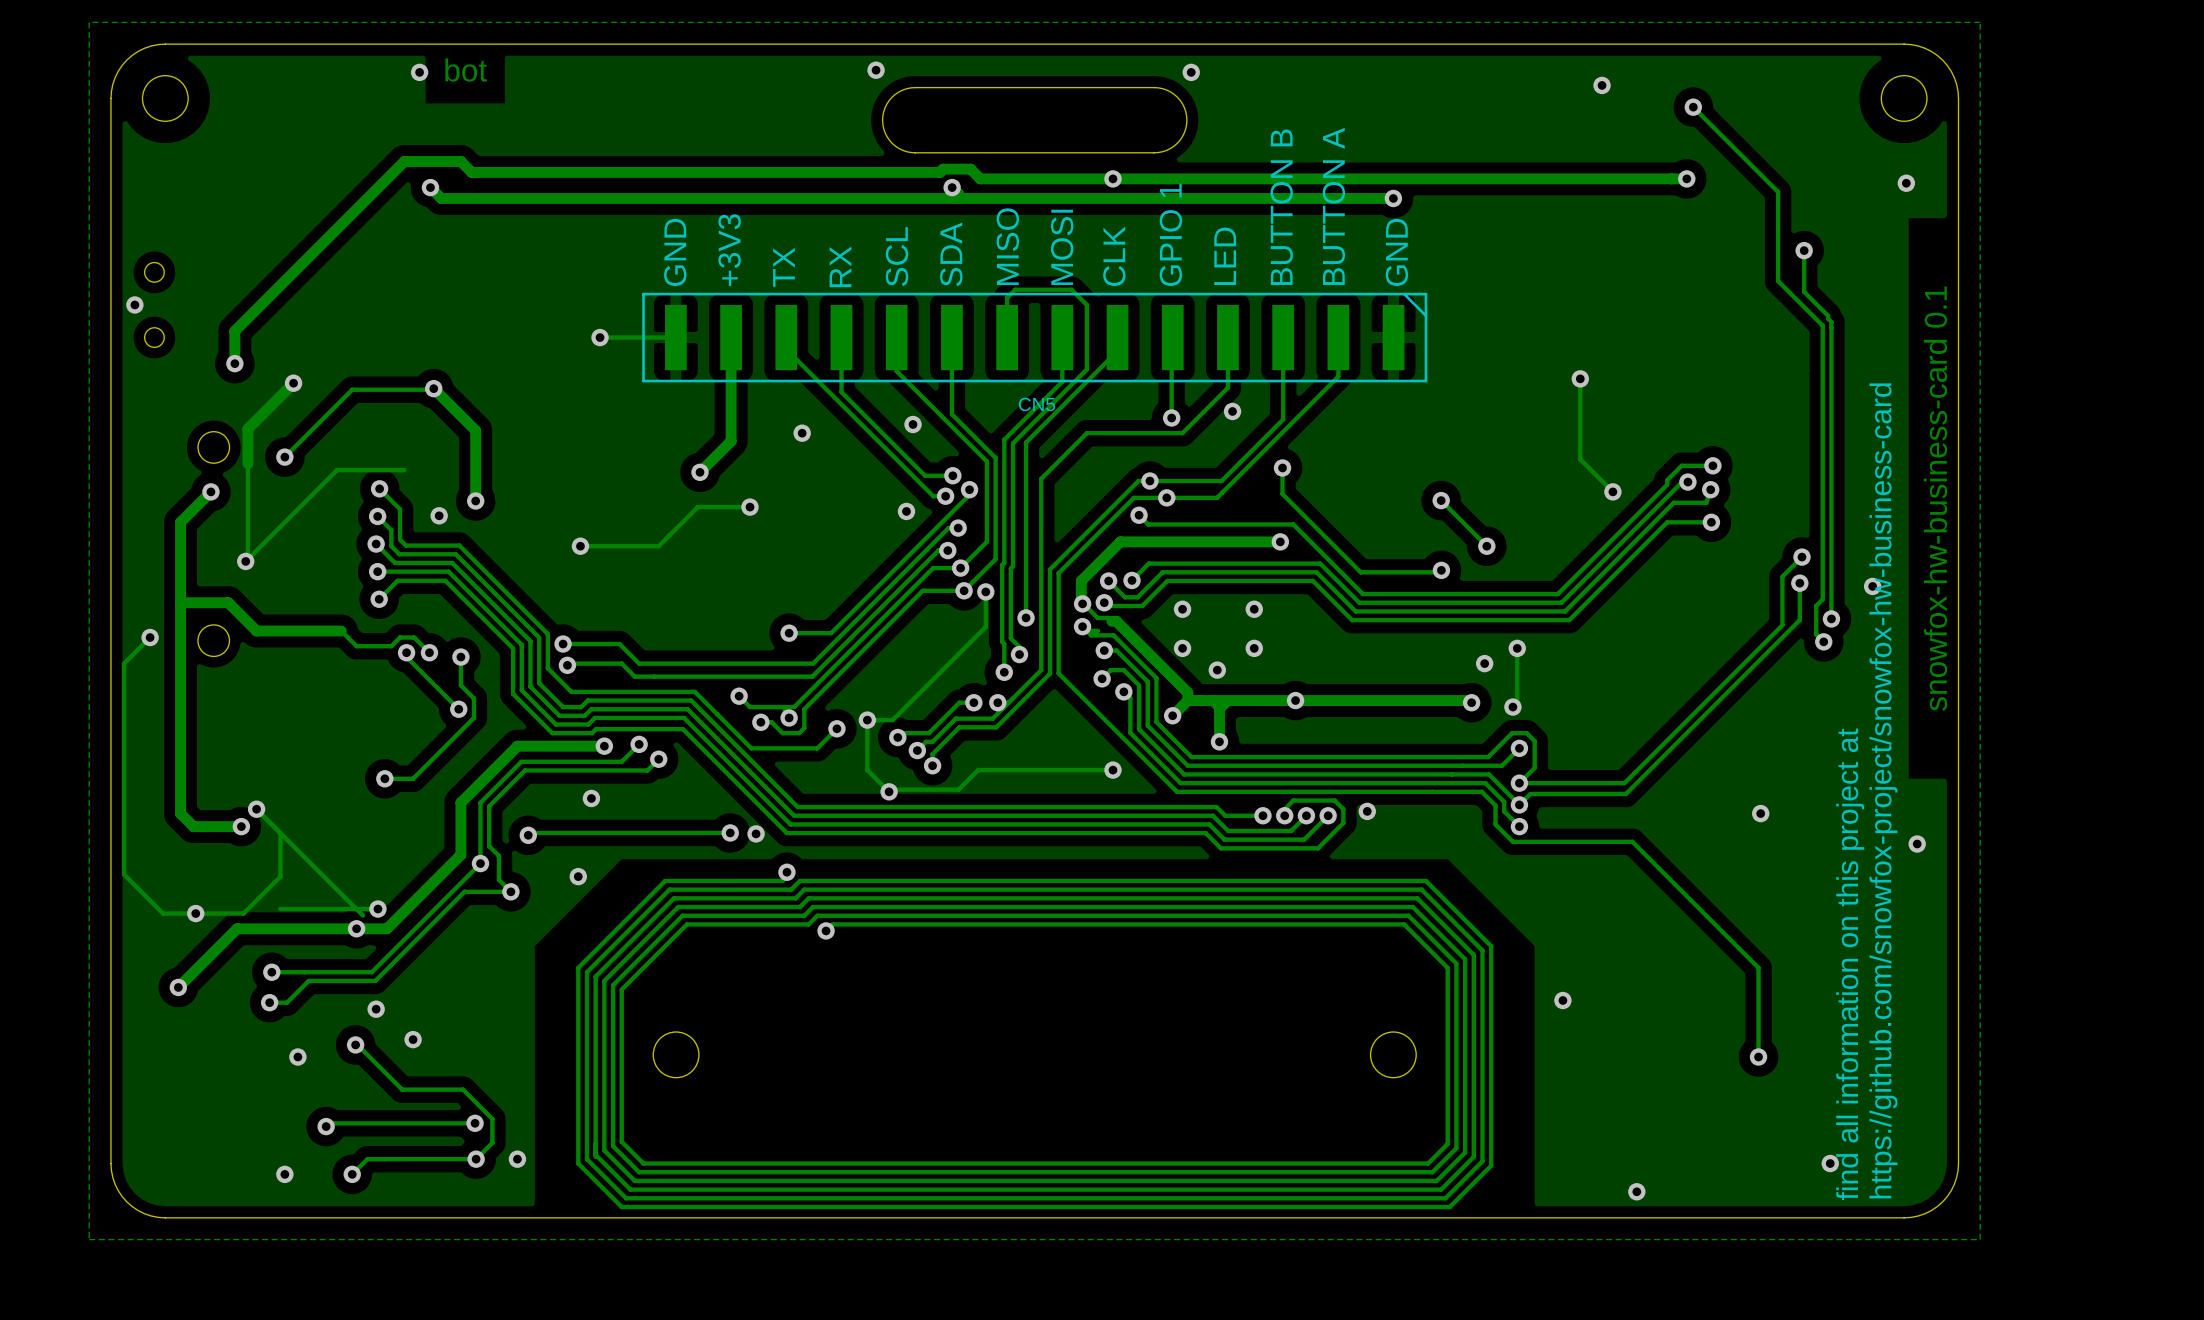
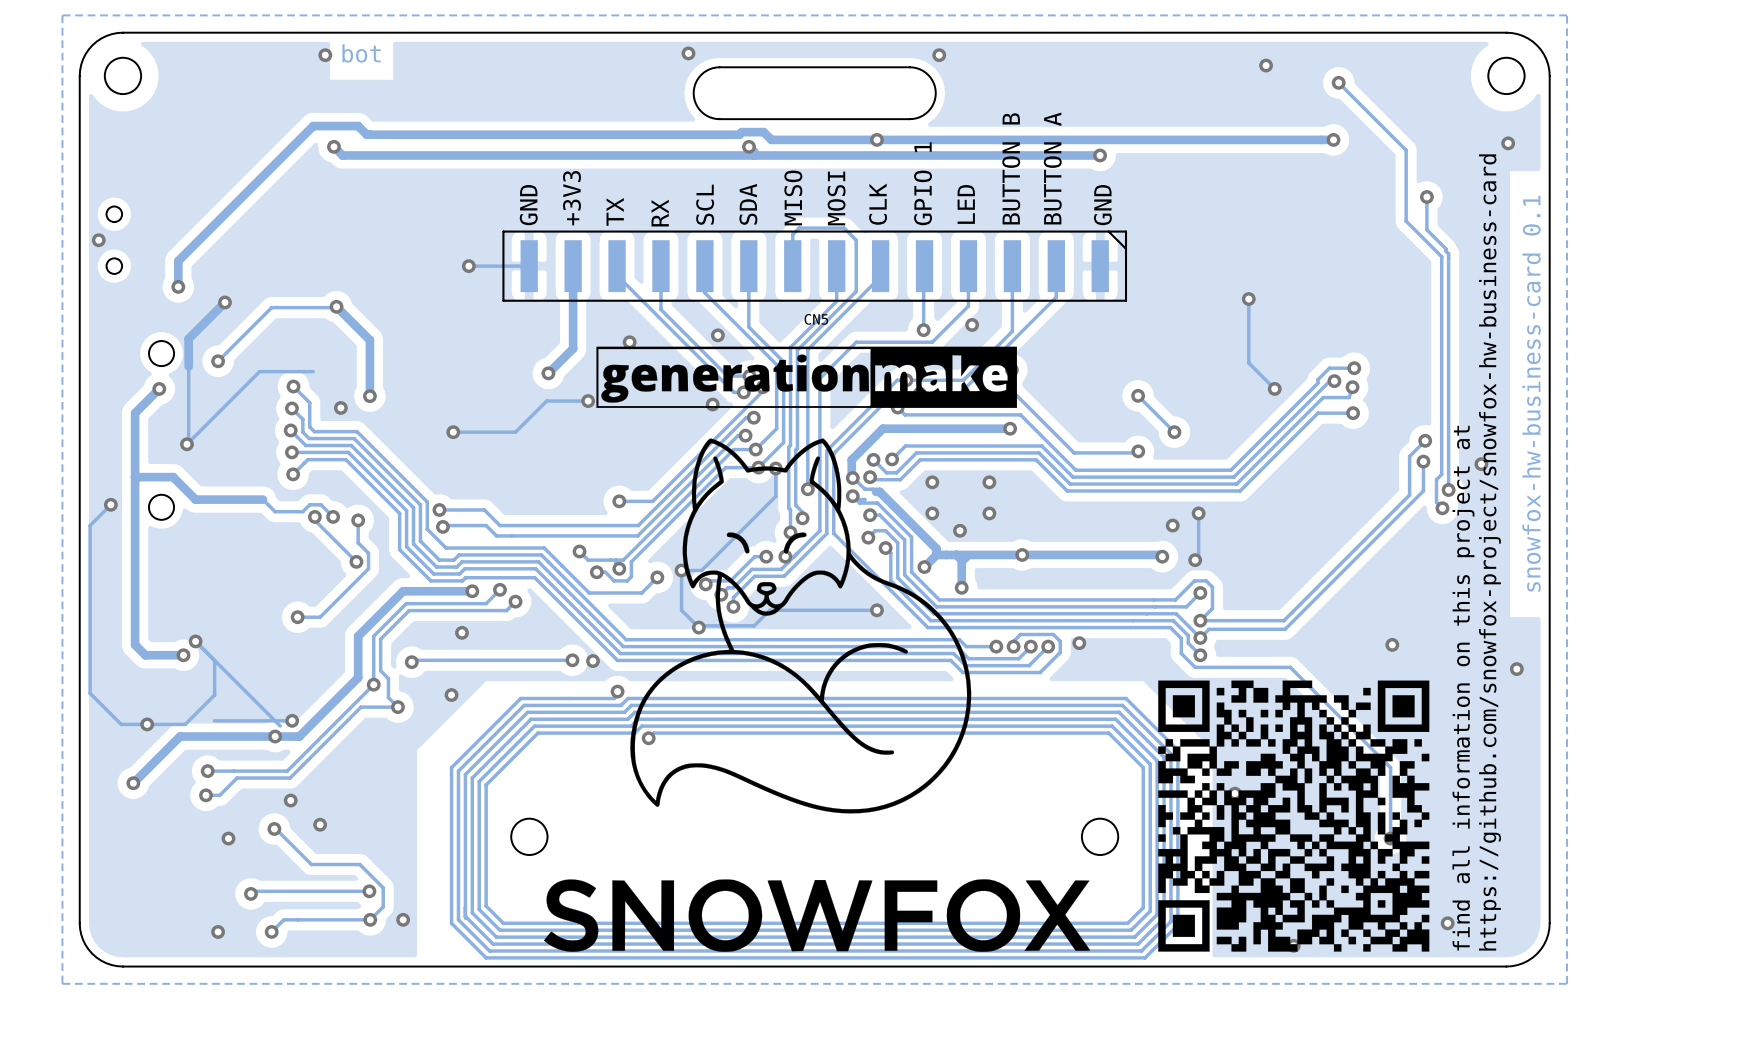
drawing: none -> [596, 346, 1018, 408]
drawing: none -> [544, 438, 1091, 952]
drawing: none -> [1158, 680, 1430, 952]

